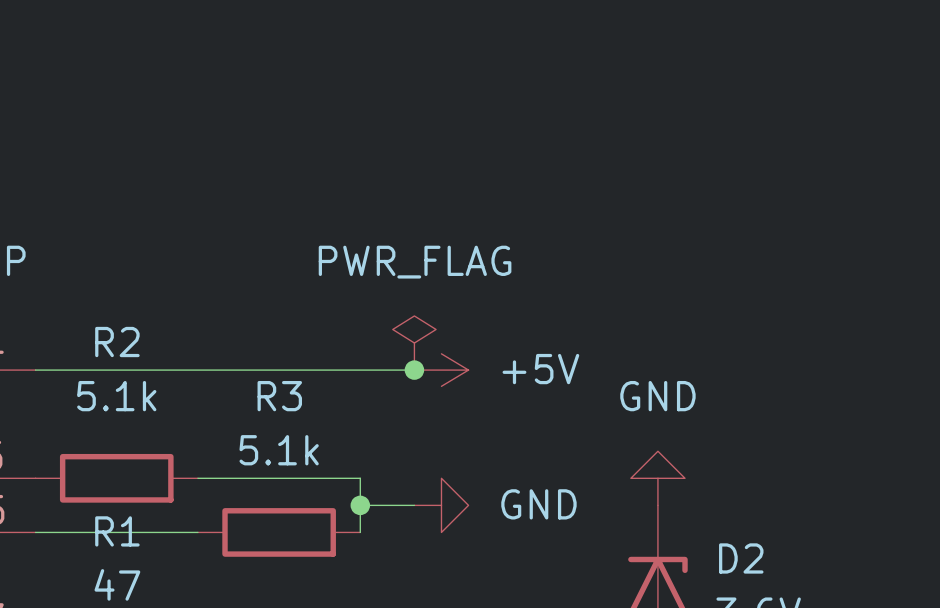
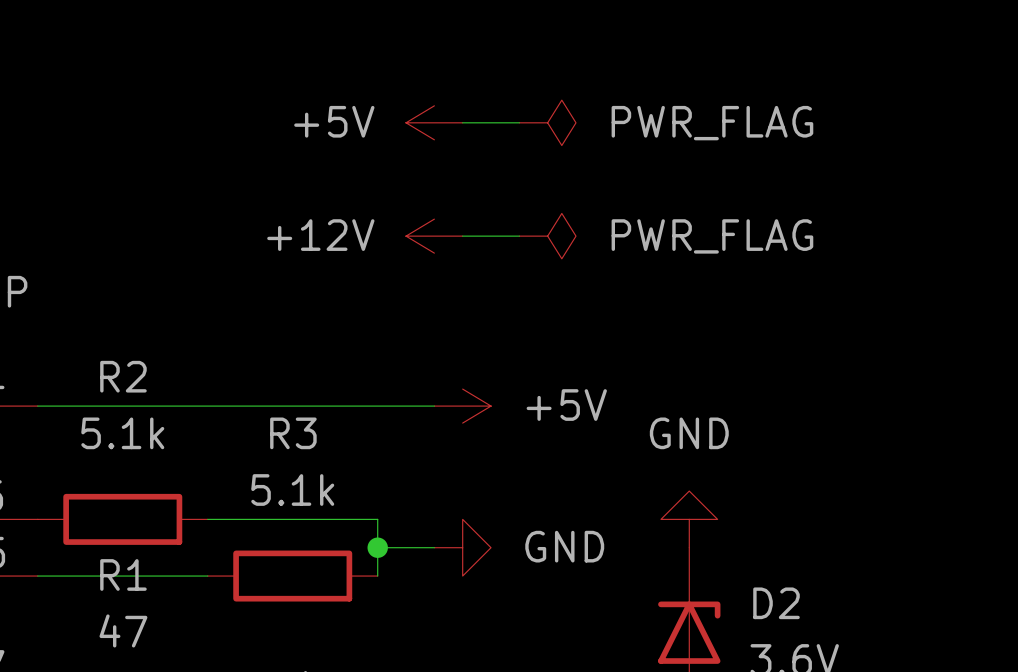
power symbol: none -> +5V (434, 122)
wire: none -> (462, 122) (519, 122)
power symbol: none -> PWR_FLAG (547, 122)
power symbol: none -> +12V (434, 236)
wire: none -> (462, 236) (519, 236)
power symbol: none -> PWR_FLAG (547, 236)
power symbol: PWR_FLAG (414, 343) -> none
junction: (414, 370) -> none

